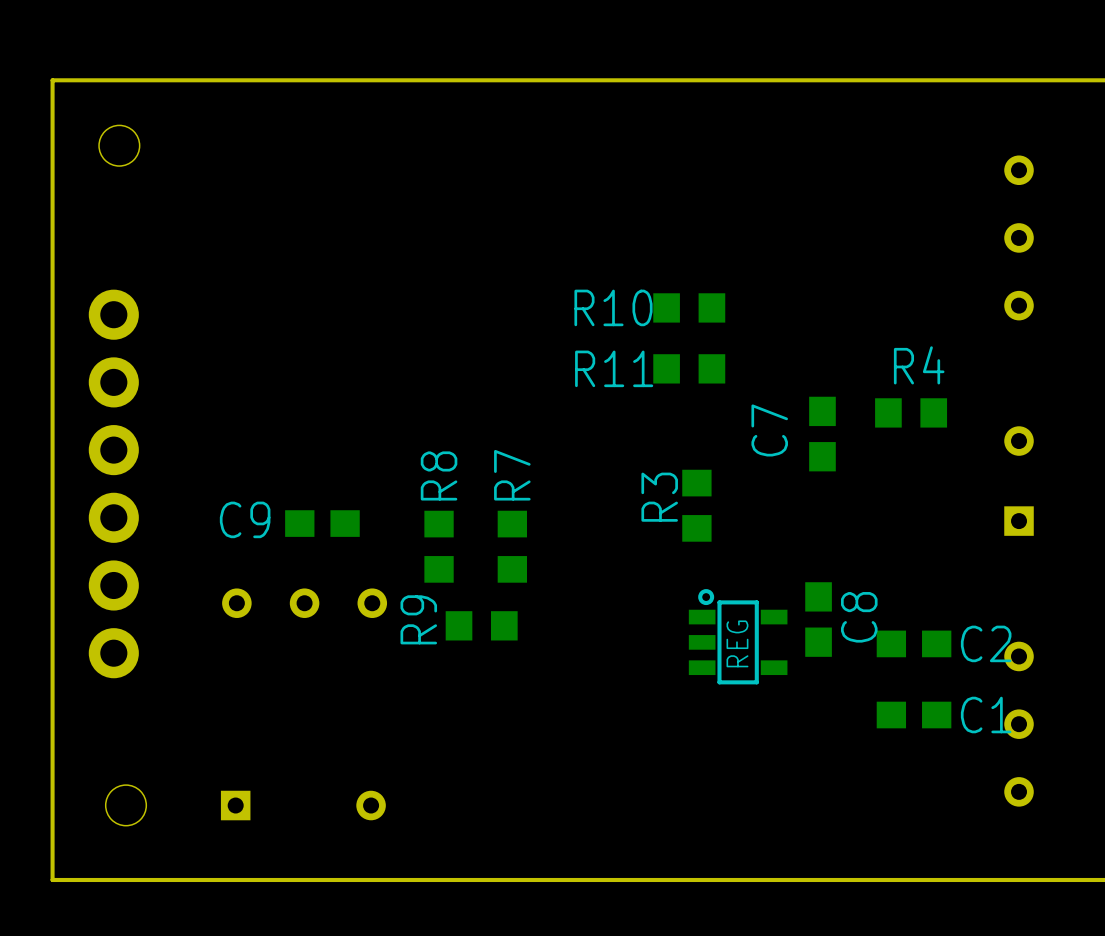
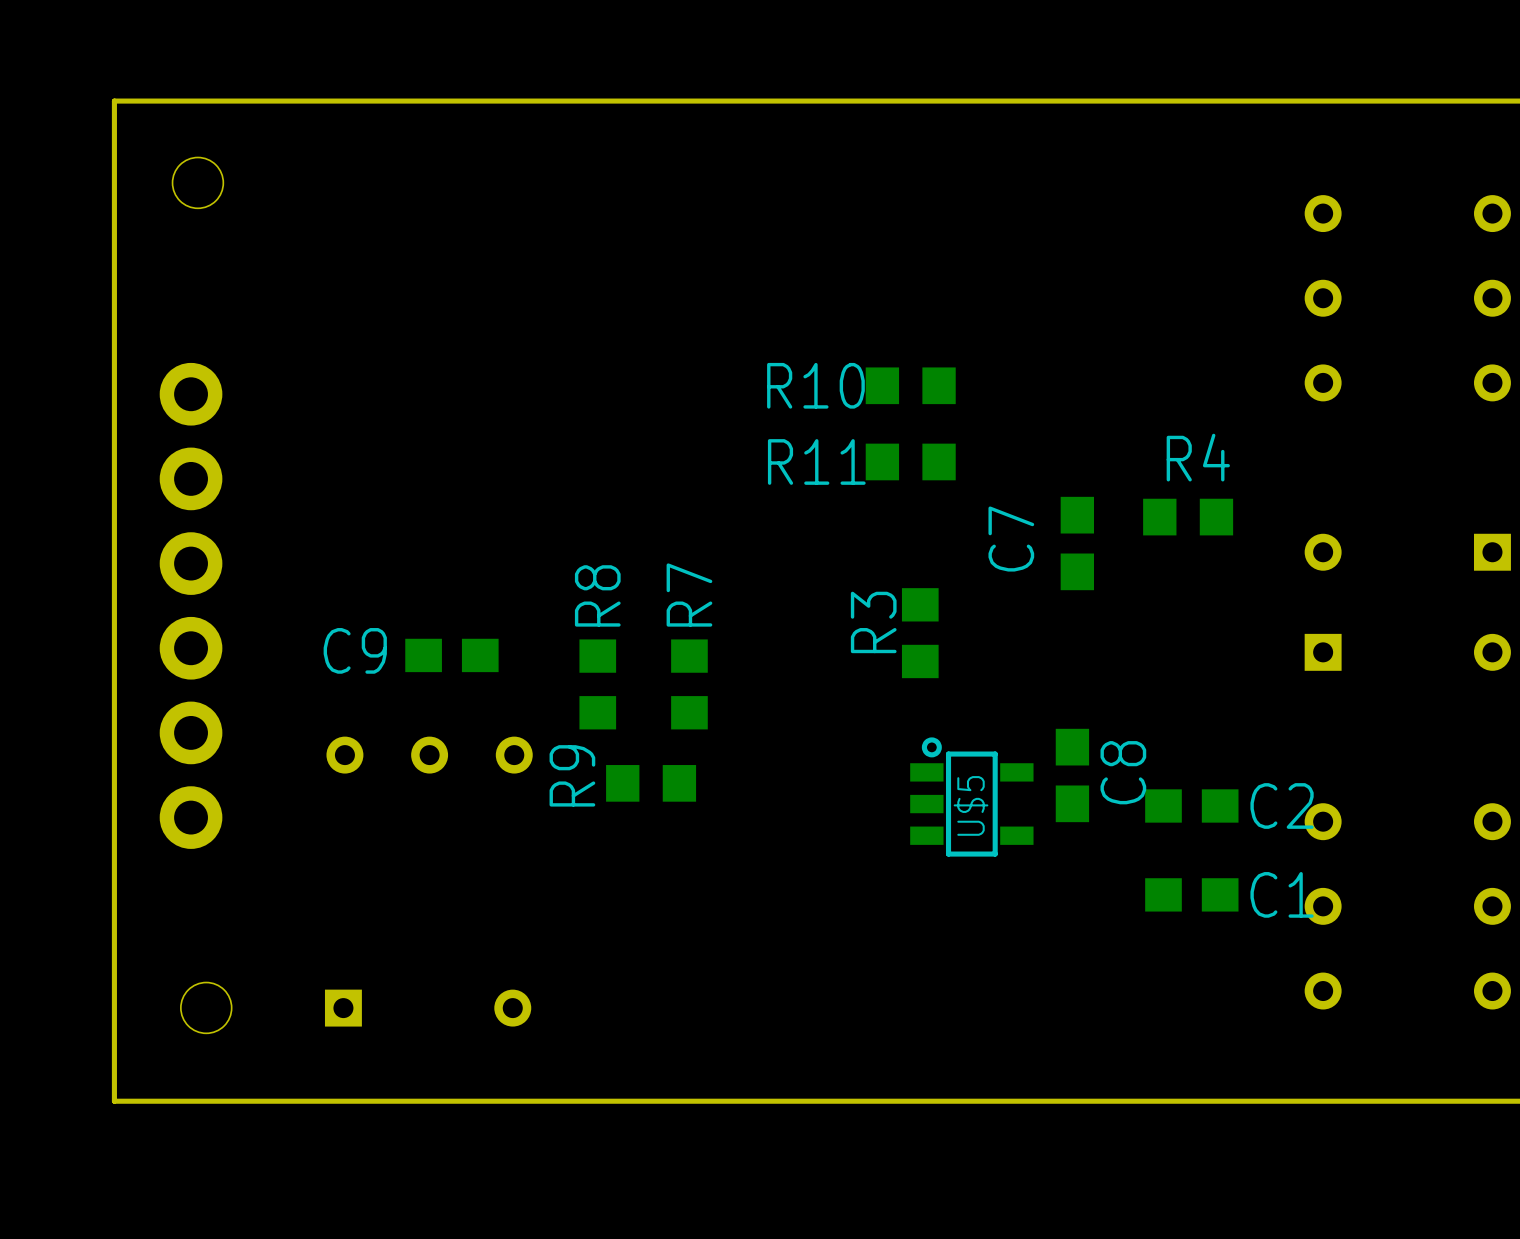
REG name: REG (737, 643) -> U$5 (971, 805)

